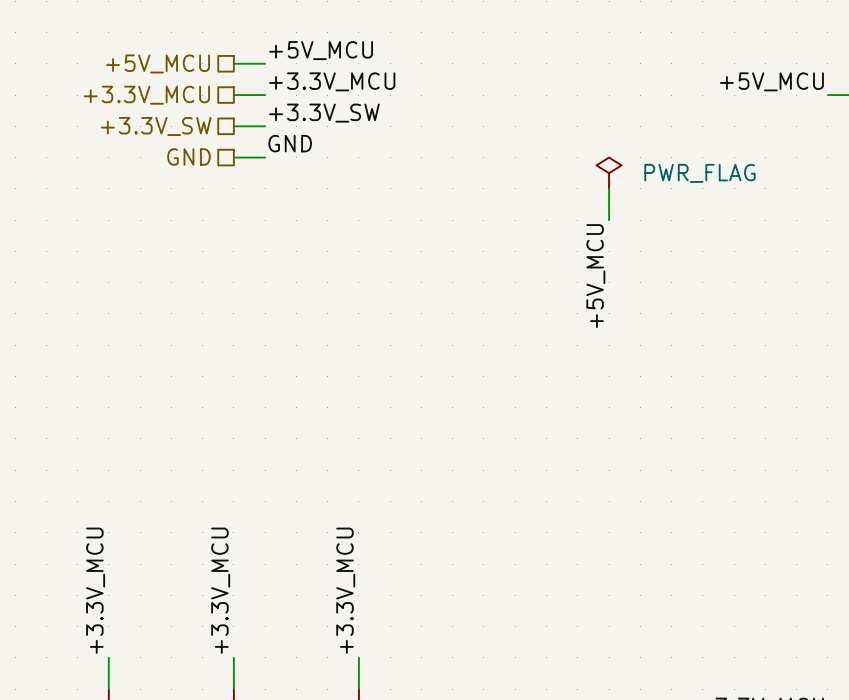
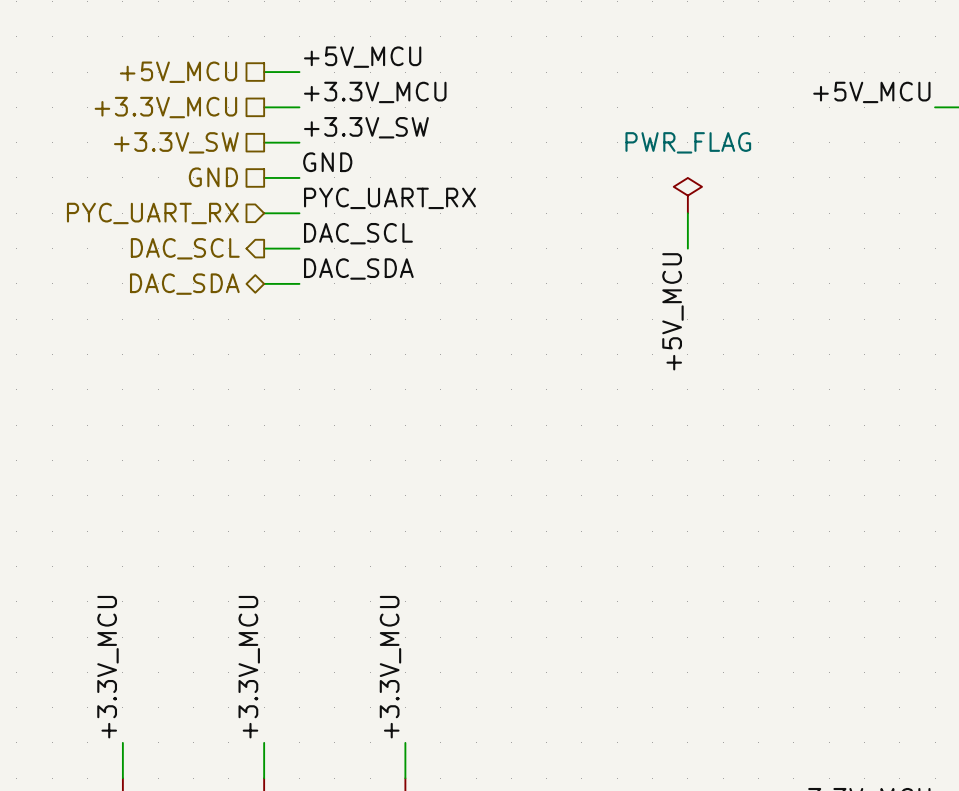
power symbol text position: PWR_FLAG (699, 173) -> PWR_FLAG (688, 142)
label: none -> PYC_UART_RX (389, 198)
wire: none -> (264, 213) (299, 213)
hierarchical label: none -> PYC_UART_RX (152, 213)
label: none -> DAC_SCL (358, 233)
hierarchical label: none -> DAC_SCL (185, 248)
wire: none -> (264, 248) (299, 248)
label: none -> DAC_SDA (358, 269)
hierarchical label: none -> DAC_SDA (184, 284)
wire: none -> (264, 283) (299, 283)

